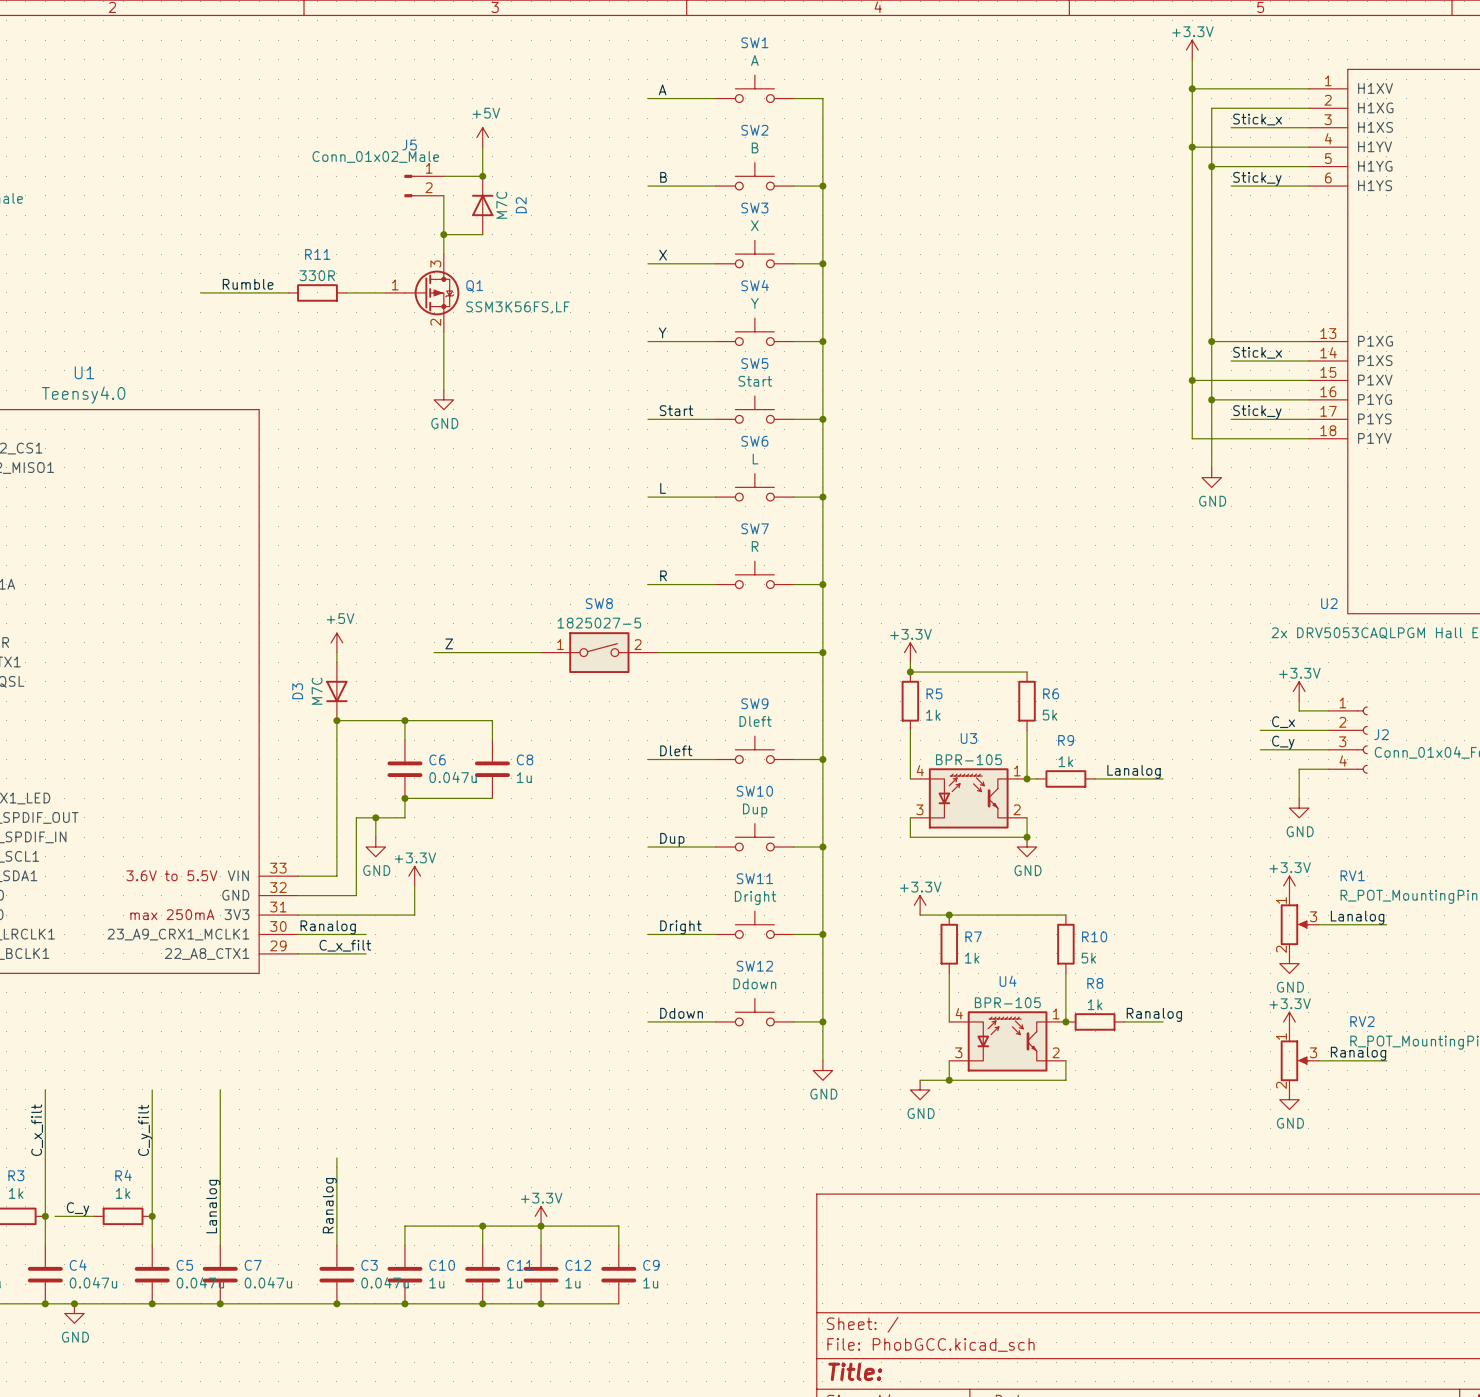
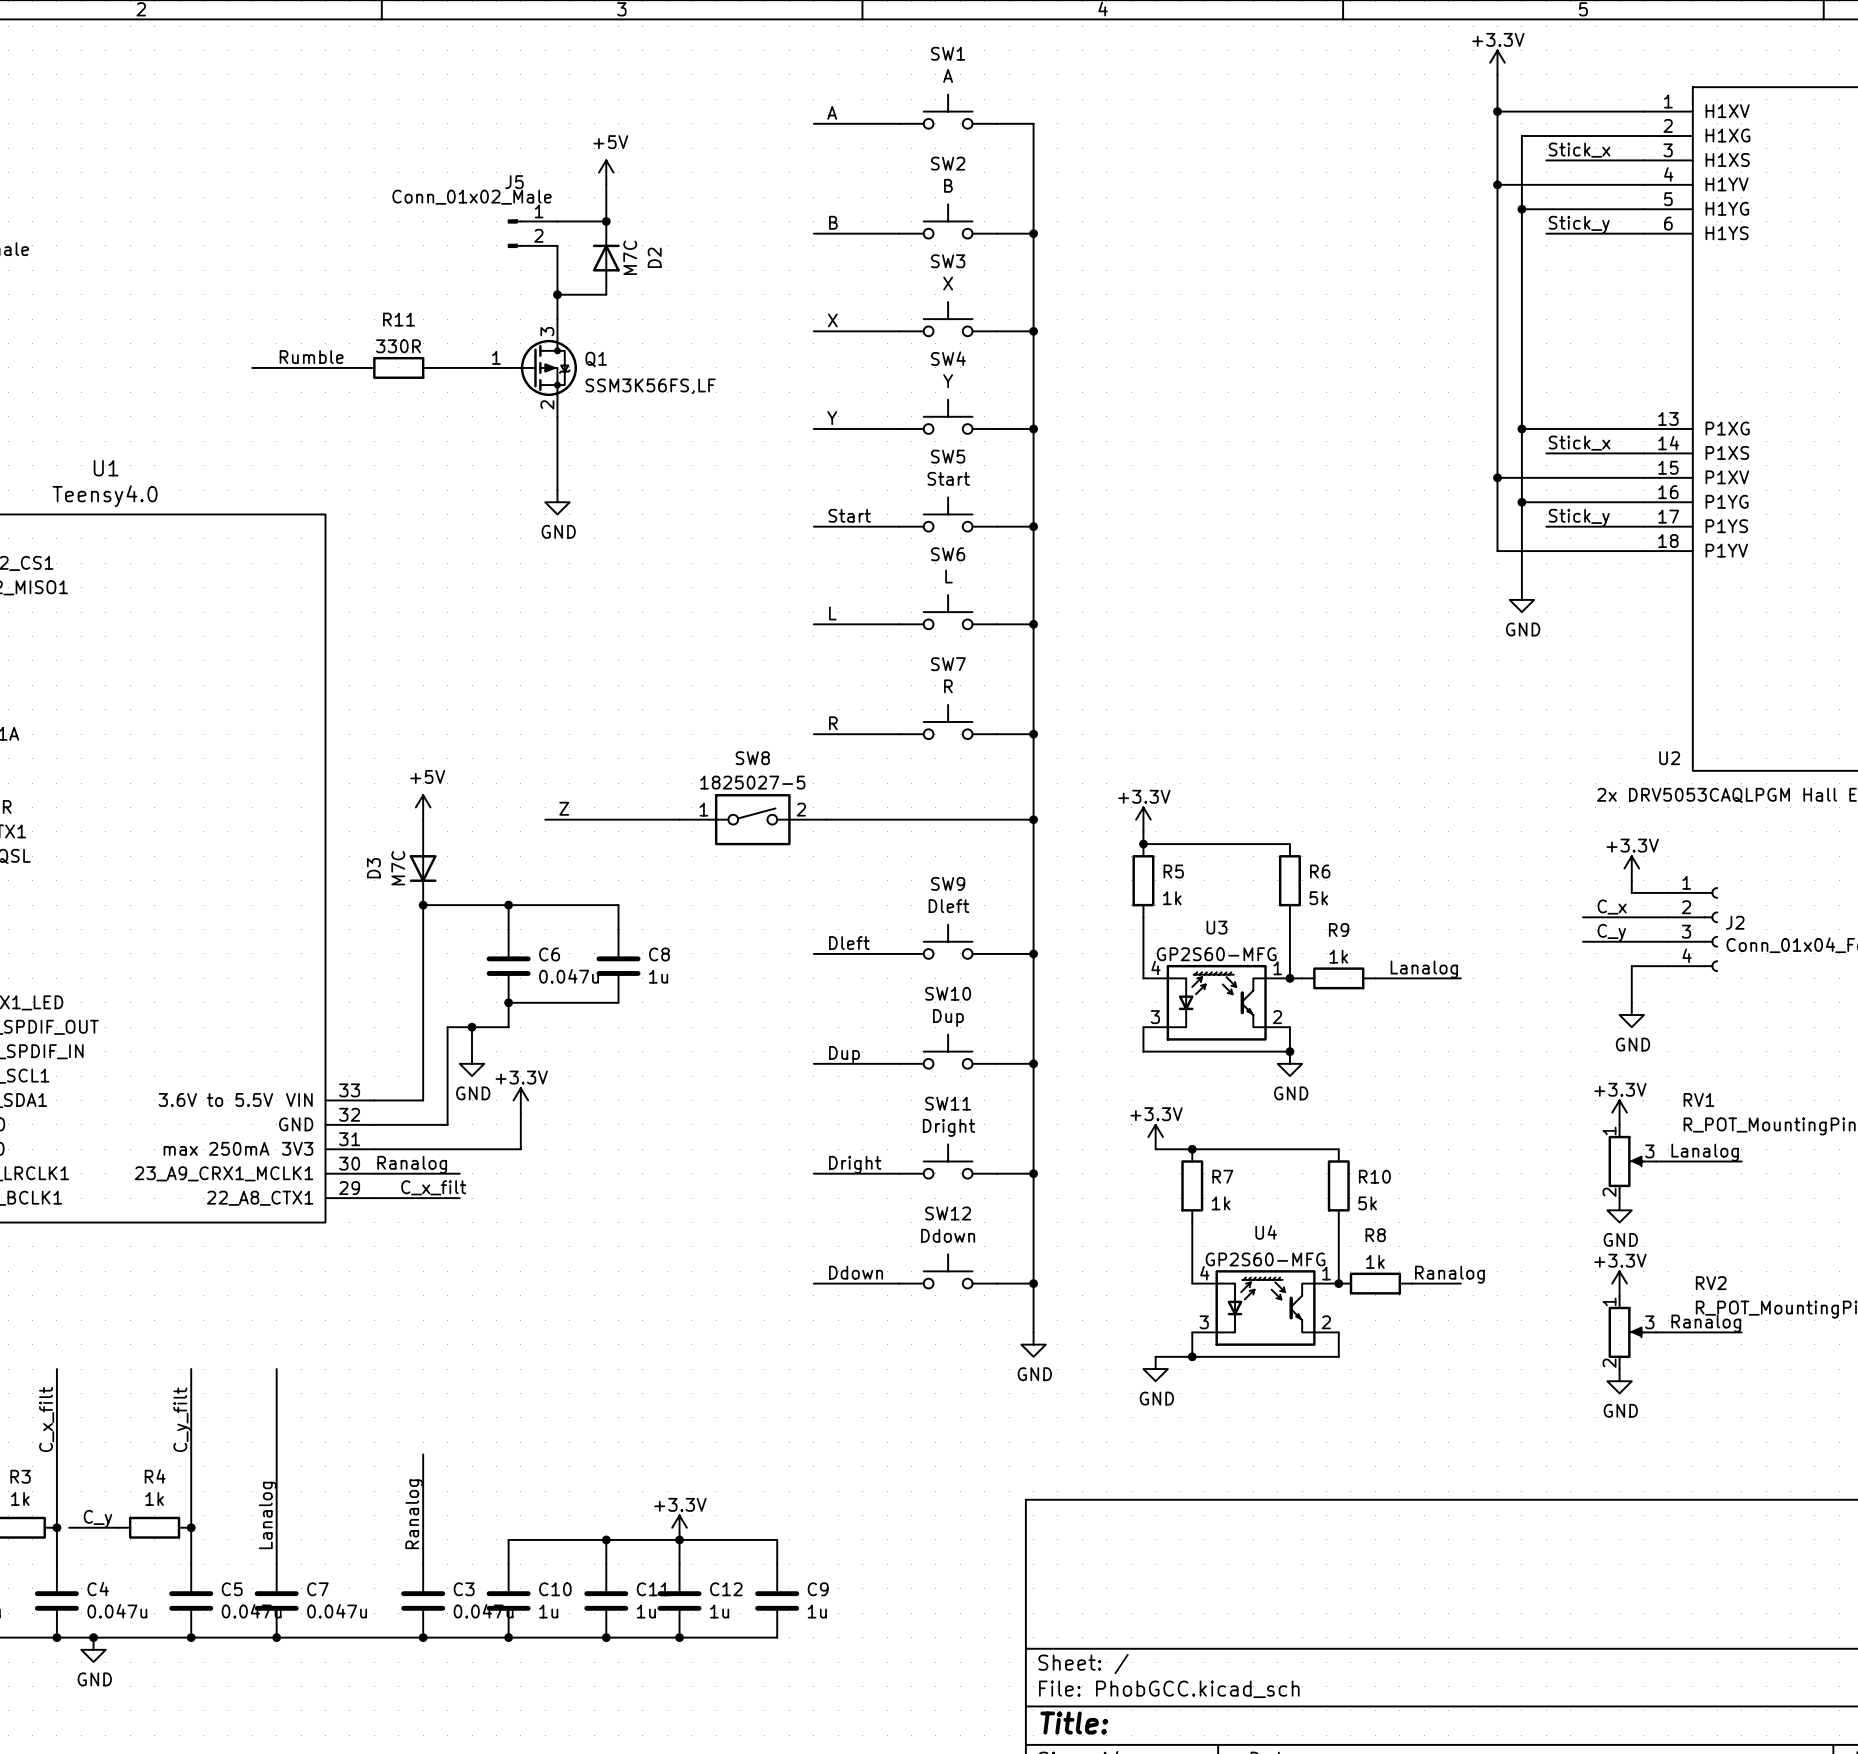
U3 value: BPR-105 (968, 759) -> GP2S60-MFG (1216, 954)
U4 value: BPR-105 (1007, 1002) -> GP2S60-MFG (1265, 1259)

